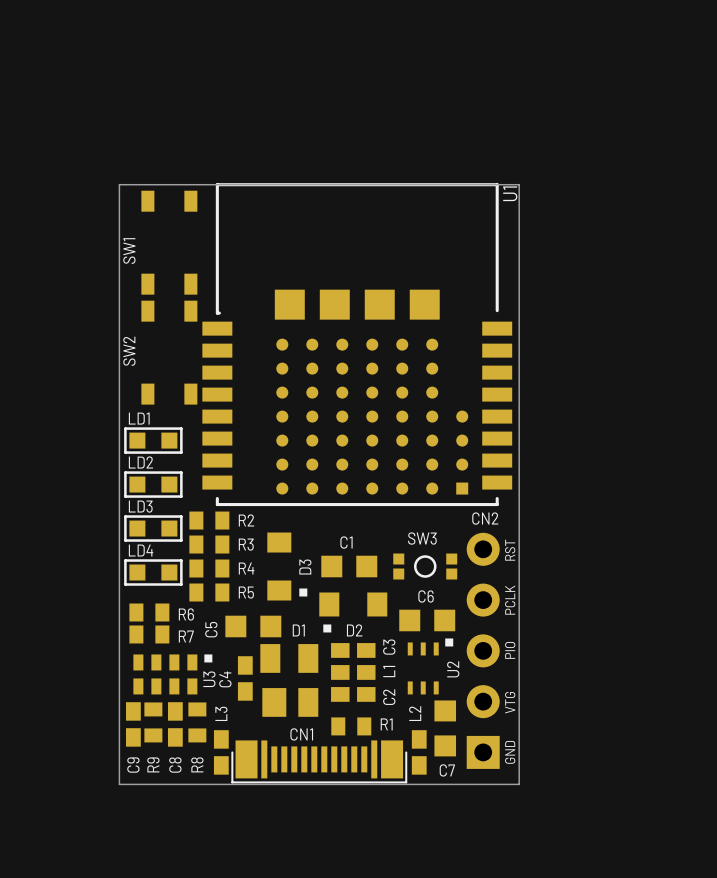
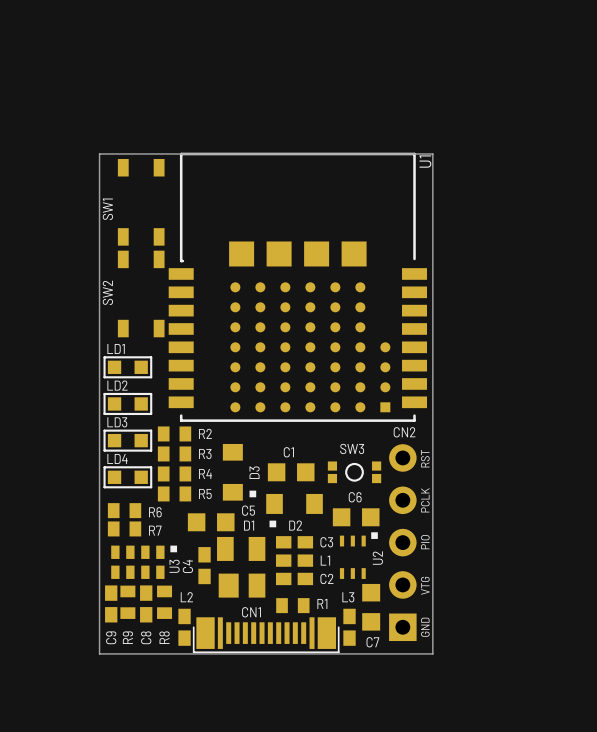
C5 name rotation: 0° (211, 629) -> 90° clockwise (248, 510)
C5 name position: C5 (211, 629) -> C5 (248, 510)
C3 name rotation: 0° (389, 647) -> 90° clockwise (326, 542)
L1 name rotation: 0° (389, 671) -> 90° clockwise (325, 560)
C2 name rotation: 0° (389, 697) -> 90° clockwise (326, 578)
L3 name: L3 (221, 713) -> L2 (186, 597)
L2 name: L2 (415, 713) -> L3 (348, 597)

